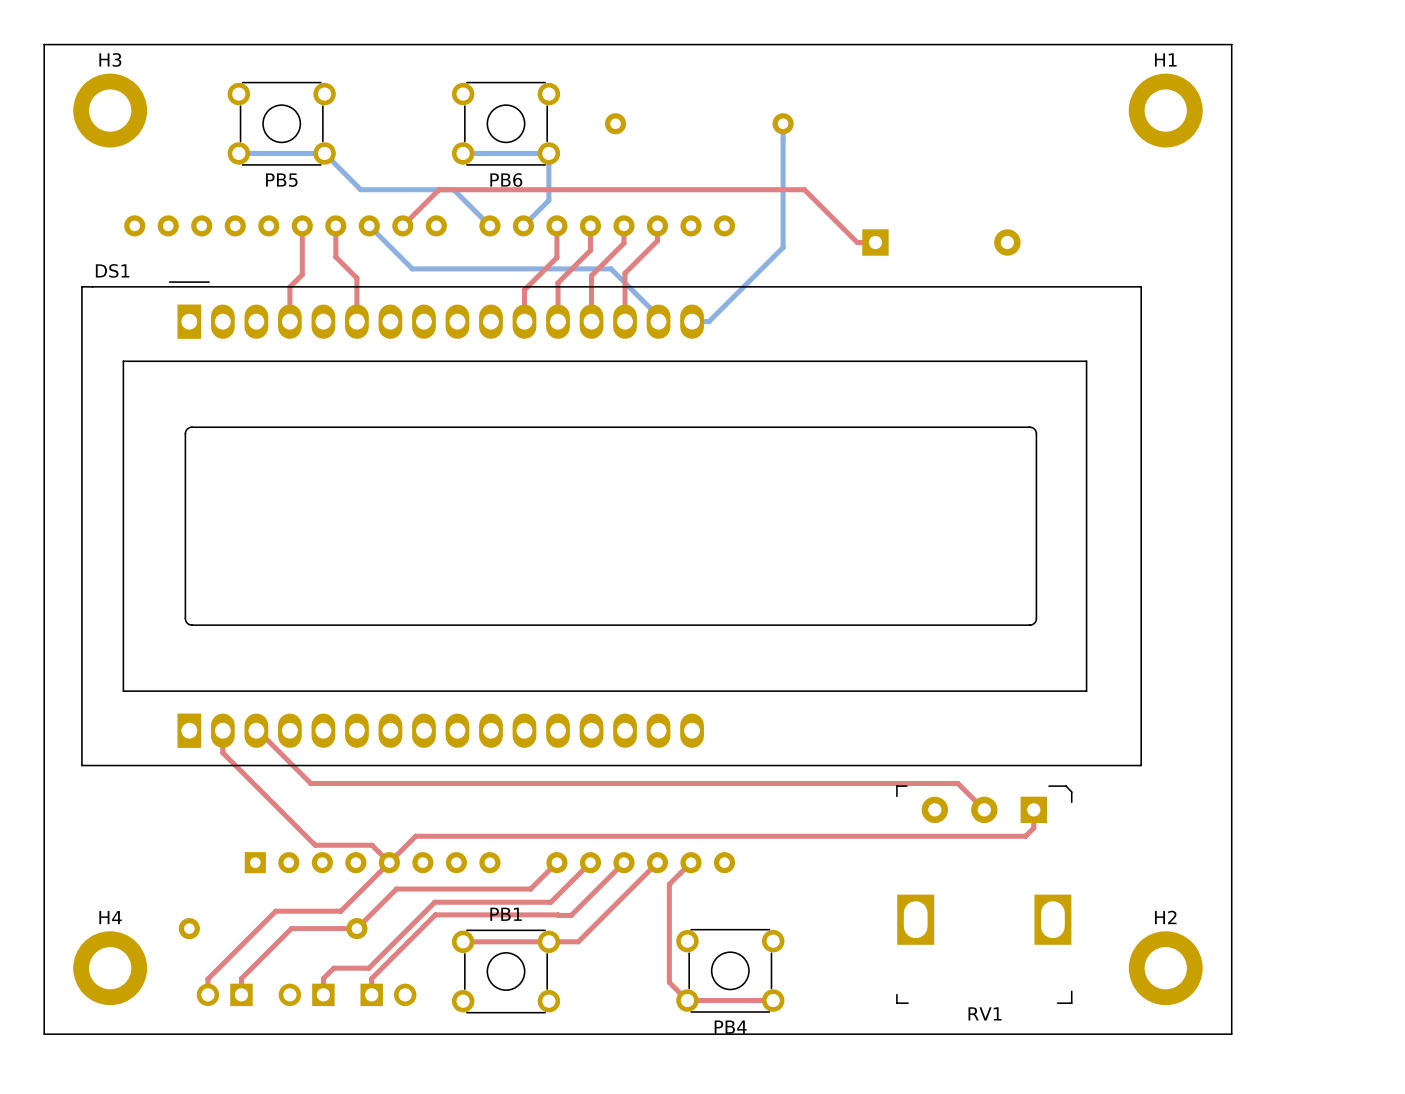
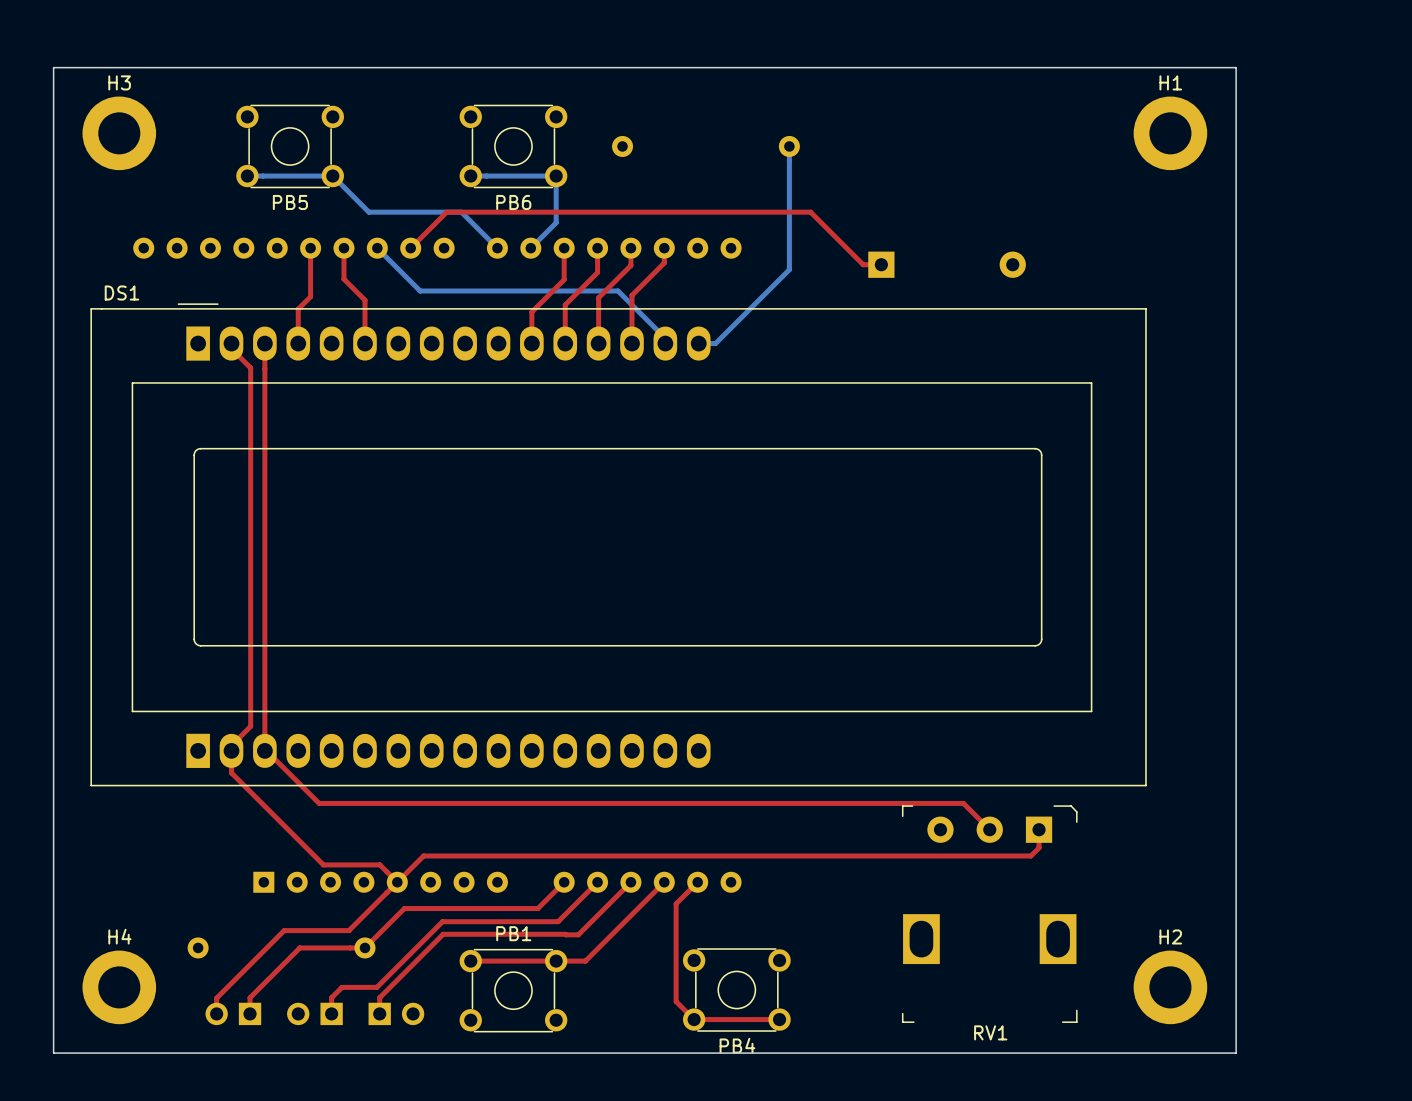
top track: none -> (231, 343) (231, 348) (250, 368) (250, 726) (231, 745) (231, 750)
top track: none -> (264, 343) (264, 750)

